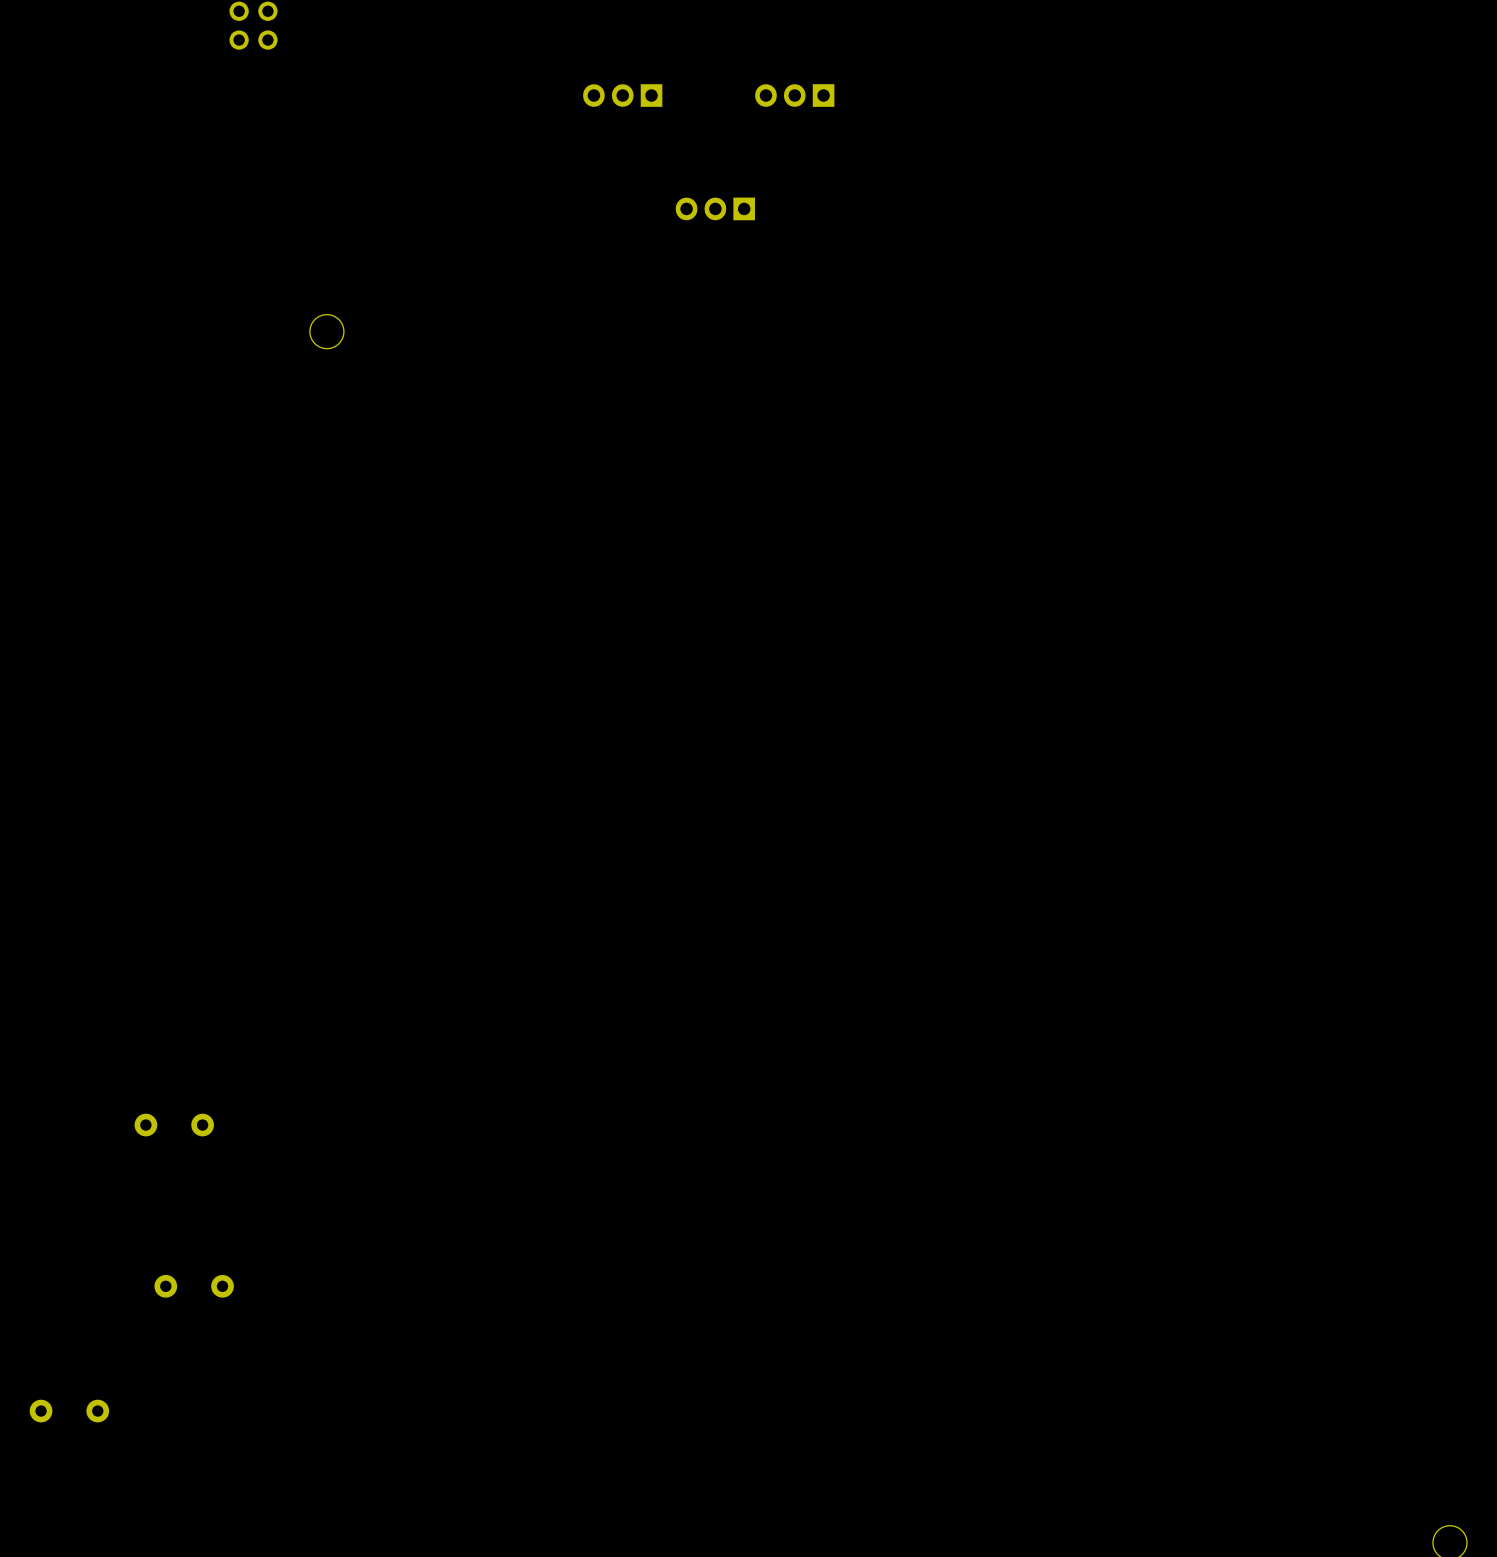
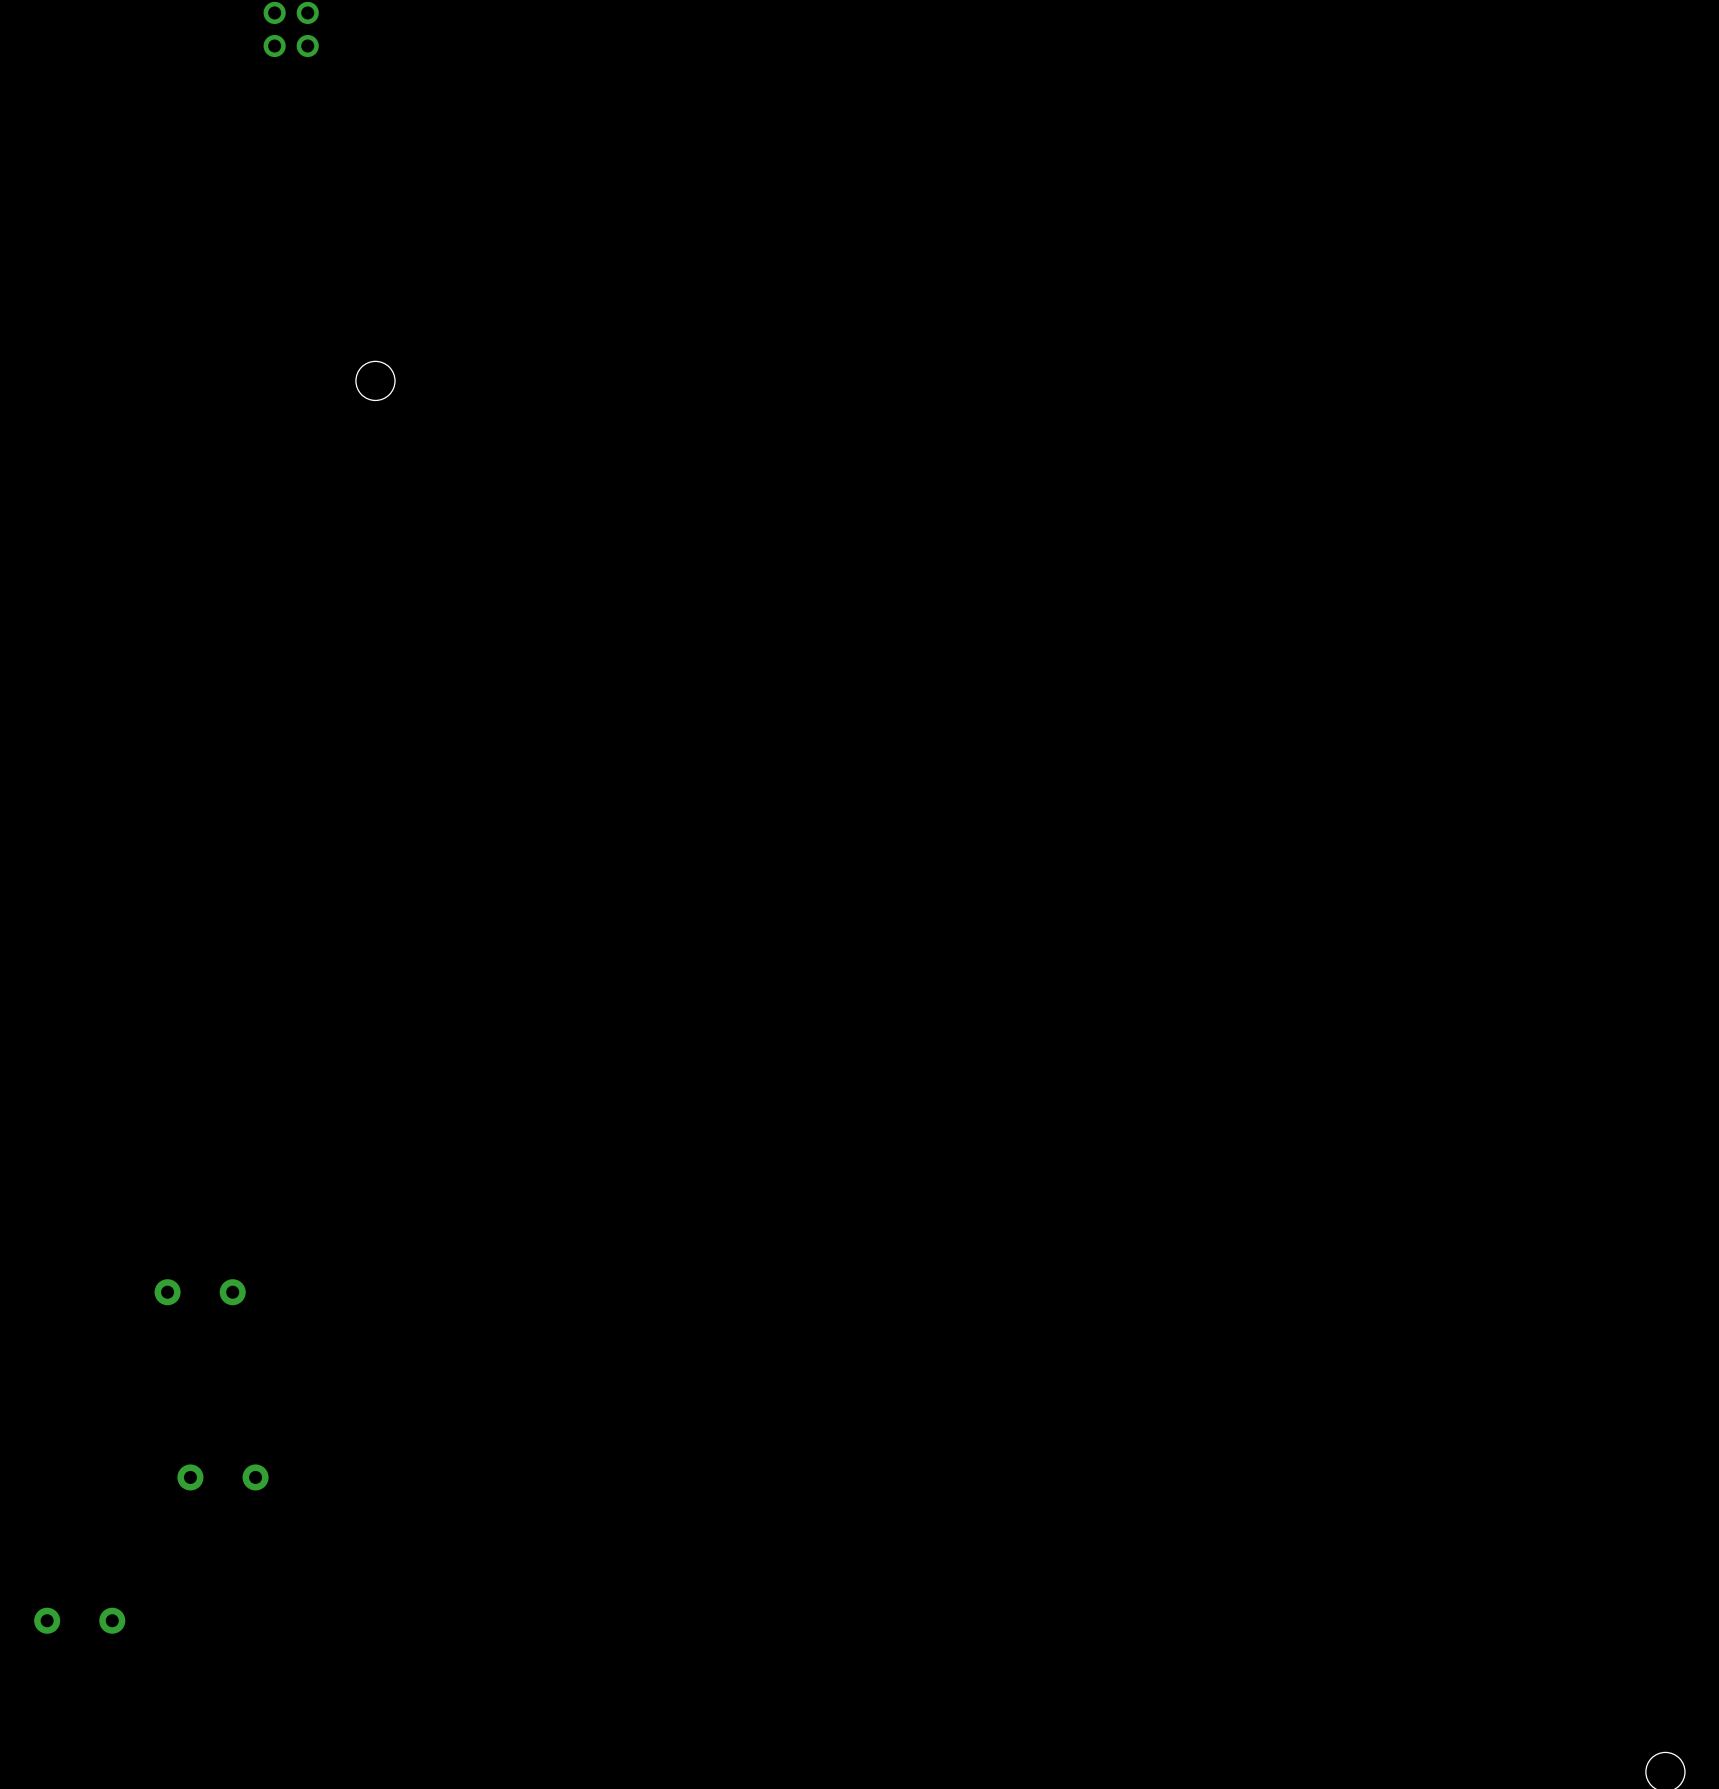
part: (622, 95) -> none
part: (794, 95) -> none
part: (715, 208) -> none

